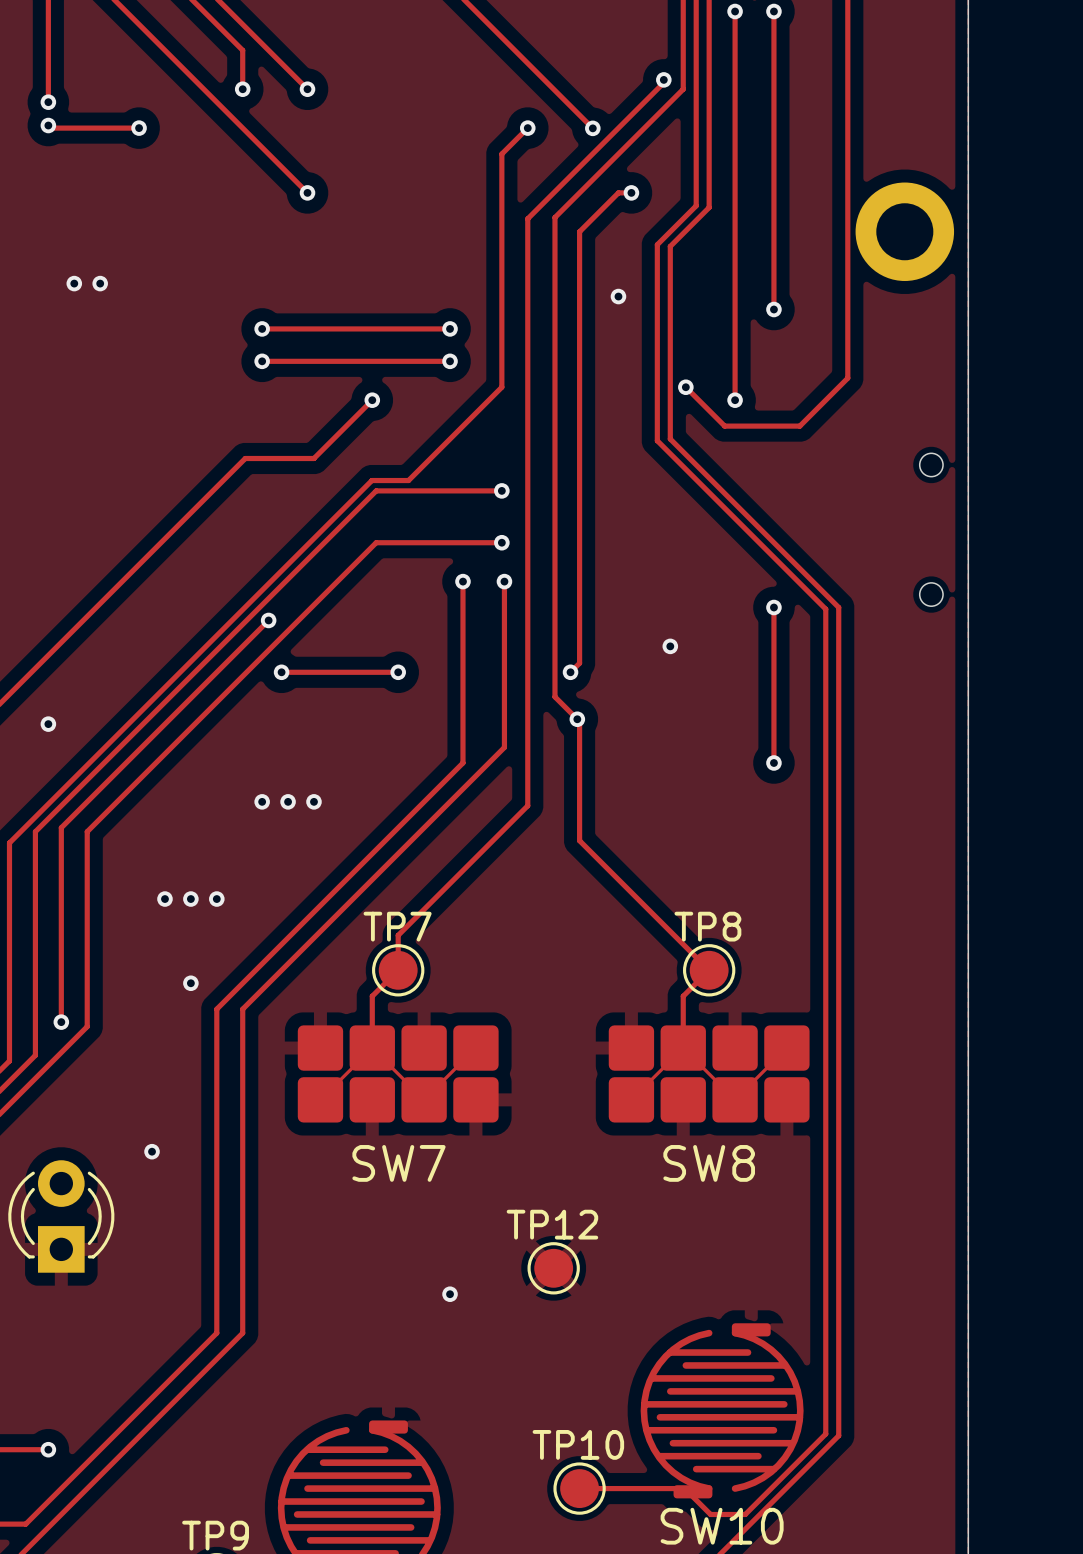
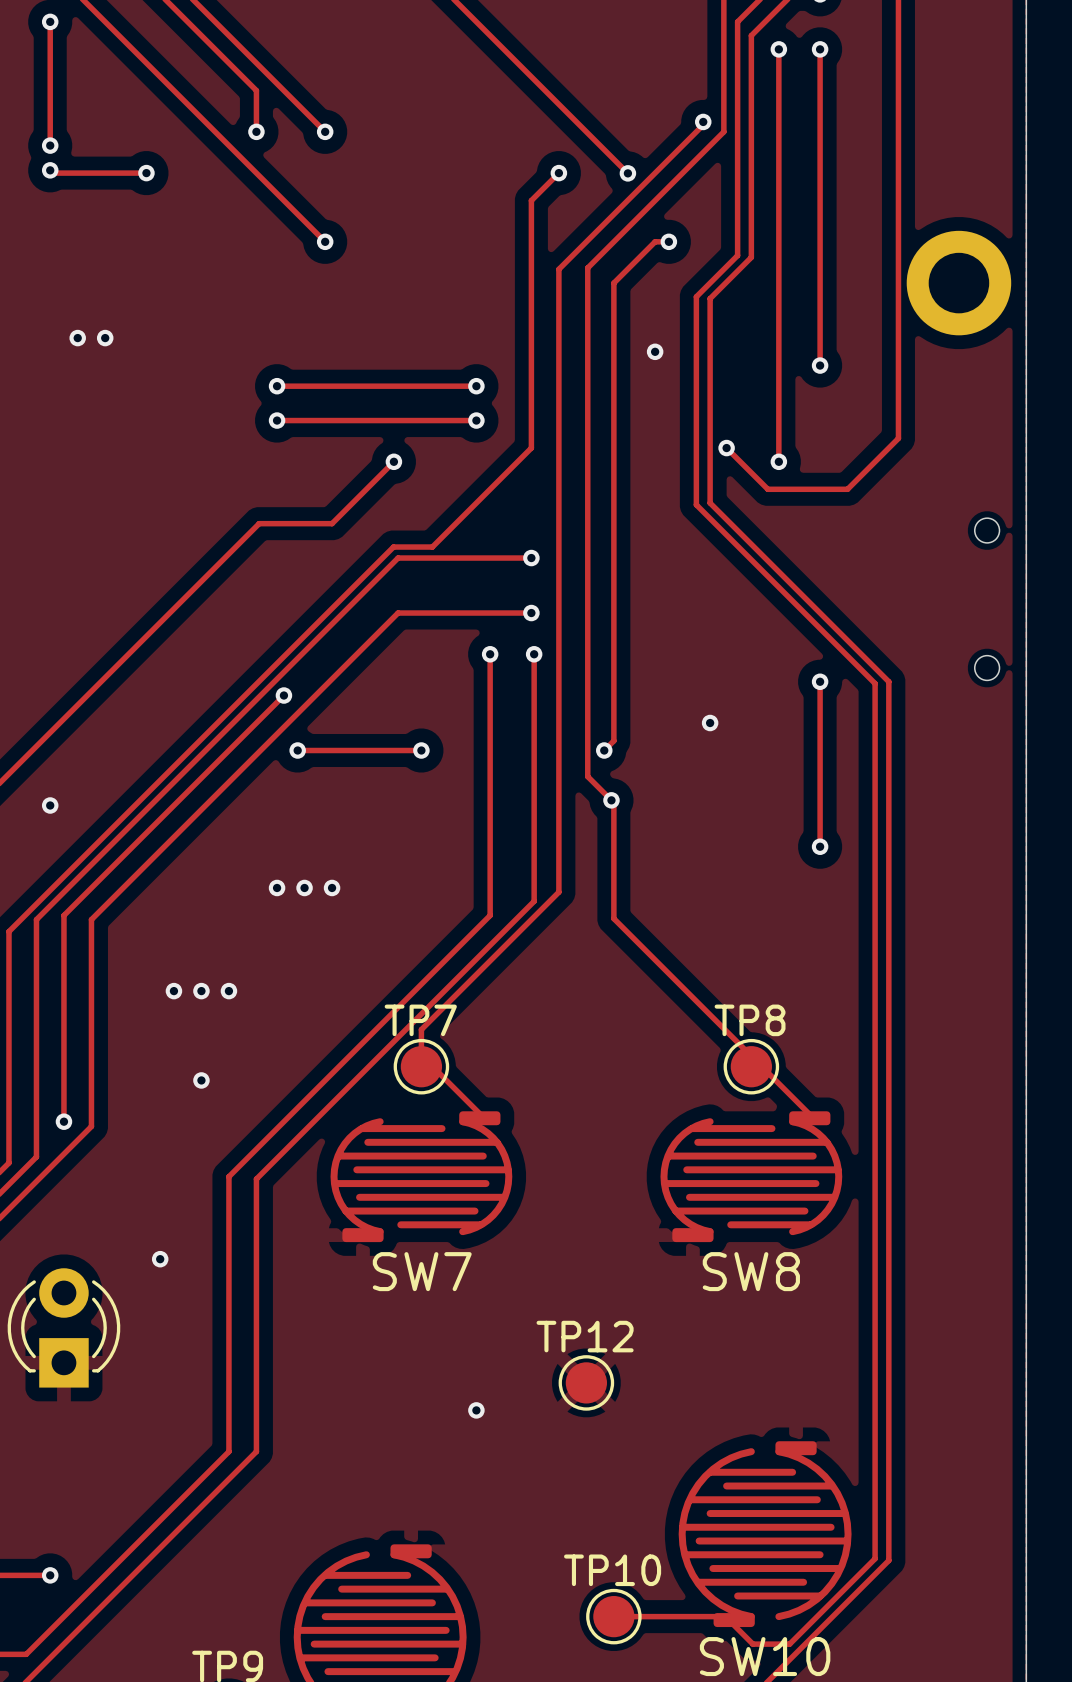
track: (504, 747) (242, 1009) (242, 1076) -> (534, 830) (534, 901) (256, 1179)
track: (462, 762) (216, 1009) (216, 1073) -> (490, 846) (490, 915) (228, 1176)
track: (579, 830) (579, 840) (709, 970) (683, 996) (683, 1034) (676, 1041) -> (613, 918) (811, 1115)
track: (398, 970) (372, 996) (372, 1034) (365, 1041) -> none
track: none -> (432, 1066) (481, 1115)
SW7 footprint: [297, 1025, 499, 1123] -> [330, 1111, 513, 1243]
SW8 footprint: [608, 1025, 810, 1123] -> [660, 1111, 843, 1243]

